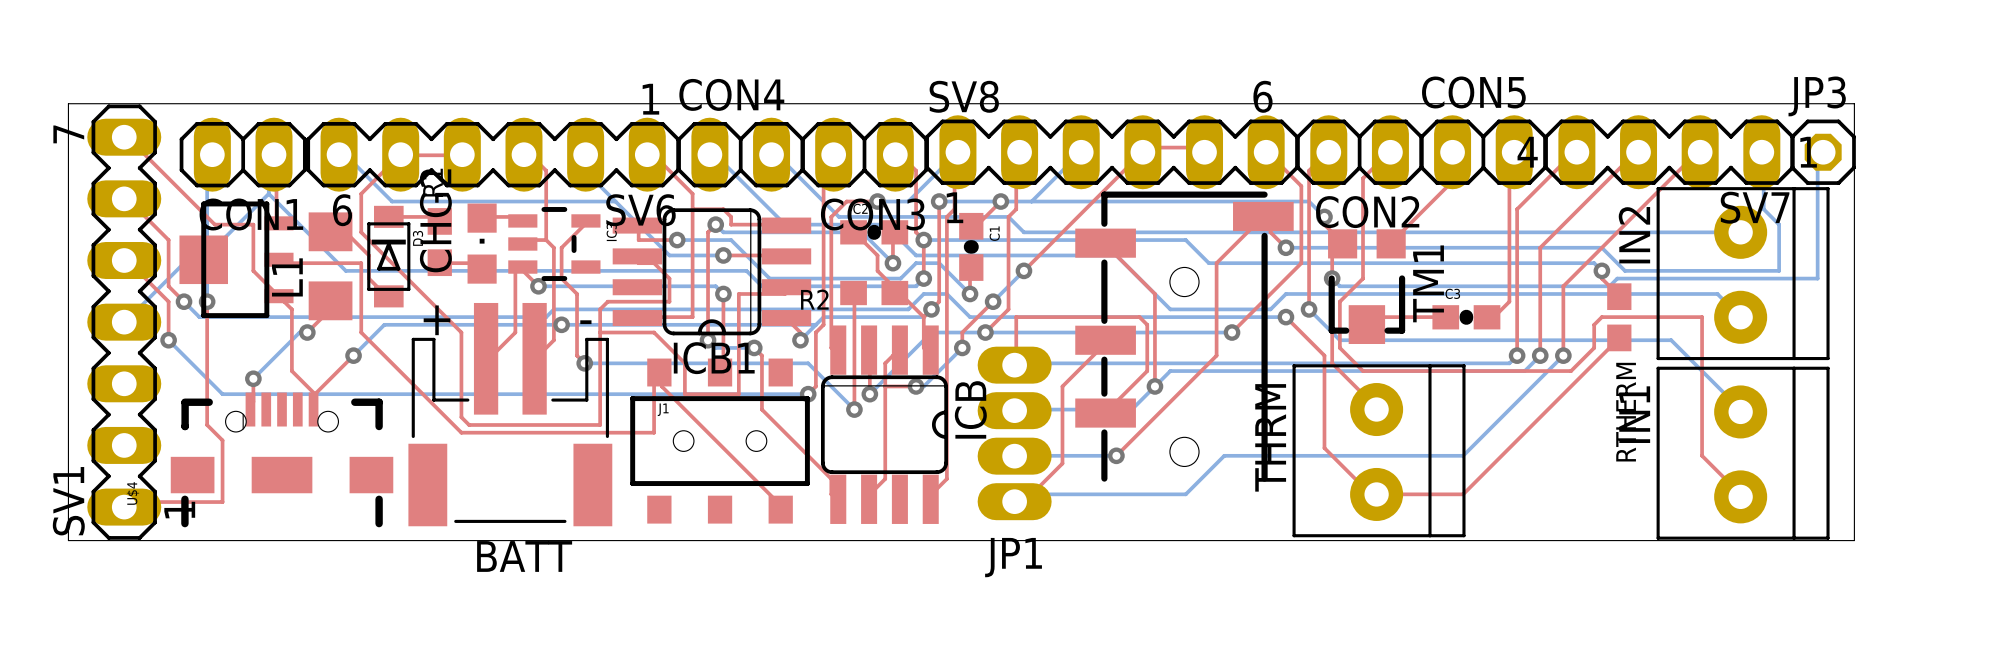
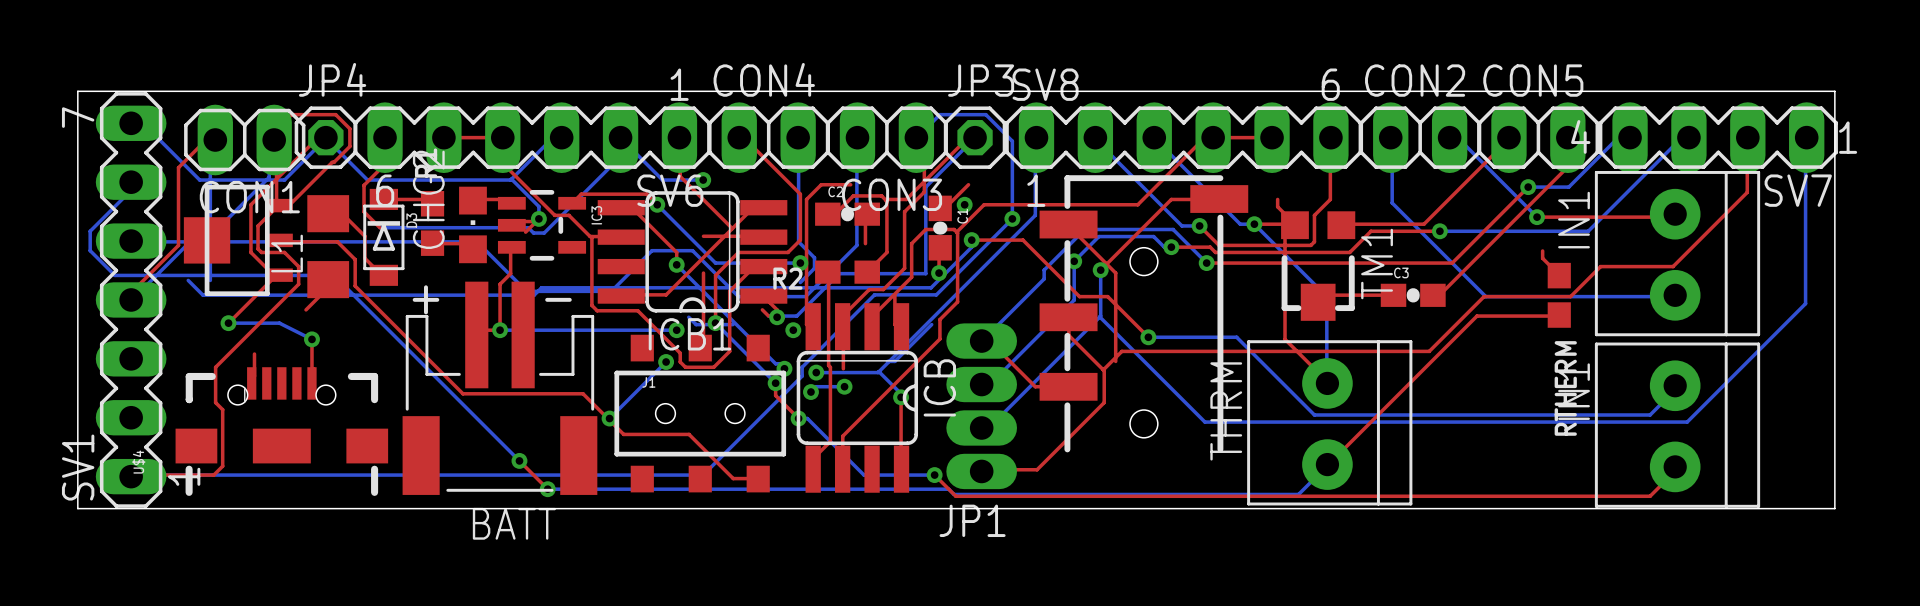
board edge: (1854, 103) (1854, 540) -> (1783, 91) (1834, 91) (1834, 508) (1783, 508)
top track: (124, 137) (130, 139) (214, 224) (253, 224) (253, 270) (291, 309) (291, 371) (315, 394) (353, 355) -> none
bottom track: none -> (131, 123) (143, 123) (199, 180) (284, 180) (325, 137) (367, 180) (510, 180) (551, 139) (561, 137)
top track: none -> (208, 137) (178, 167) (178, 245) (132, 291) (131, 299)
top track: none -> (325, 137) (325, 139) (316, 139) (250, 204) (250, 252) (272, 273) (278, 275) (276, 275) (228, 323)
JP4: none -> (325, 137)
top track: none -> (385, 137) (383, 165) (364, 185) (364, 211) (379, 227)
top track: none -> (679, 137) (680, 176) (732, 228)
top track: none -> (739, 137) (745, 139) (800, 194) (800, 240) (788, 252) (738, 252) (715, 275) (715, 323)
bottom track: none -> (798, 137) (798, 241) (814, 257) (814, 268) (800, 282)
bottom track: none -> (857, 137) (856, 245) (805, 296) (738, 296) (692, 250) (651, 250) (611, 291) (526, 291) (477, 241) (131, 241)
bottom track: none -> (916, 137) (939, 114) (985, 114) (1012, 141) (1012, 218) (936, 294) (874, 294) (802, 367) (802, 376) (703, 475) (132, 475) (131, 476)
bottom track: (957, 152) (908, 201) (877, 201) -> none
top track: none -> (975, 137) (966, 139) (906, 199) (886, 200)
bottom track: none -> (975, 137) (925, 187) (925, 273) (839, 273) (796, 316) (768, 316)
top track: (1019, 152) (1016, 155) (1016, 209) (1008, 216) (1008, 309) (985, 332) -> none
bottom track: none -> (1036, 137) (1035, 215) (878, 372) (816, 372)
bottom track: (1081, 152) (1031, 201) -> none
SV8 position: (1112, 152) -> (1183, 137)
bottom track: none -> (1095, 137) (1181, 225) (1199, 225)
bottom track: none -> (1154, 137) (1240, 224) (1254, 224) (1326, 296) (1327, 383)
top track: (1204, 152) (1201, 147) (1147, 147) (1023, 270) -> none
top track: (1266, 152) (1301, 186) (1301, 263) (1232, 332) -> none
top track: none -> (1272, 137) (1213, 137) (1203, 139) (1137, 204) (984, 204) (956, 232)
top track: (1328, 152) (1309, 170) (1309, 309) -> none
CON2 position: (1359, 152) -> (1420, 137)
top track: (1390, 152) (1363, 178) (1363, 233) -> (1330, 137) (1330, 199) (1314, 215)
bottom track: none -> (1390, 137) (1392, 203) (1485, 296) (1679, 297)
top track: (1452, 152) (1447, 155) (1447, 186) (1391, 243) -> (1508, 137) (1423, 224) (1341, 225)
CON5 position: (1483, 152) -> (1538, 137)
bottom track: none -> (1449, 137) (1450, 139) (1459, 139) (1537, 217)
top track: (1514, 152) (1509, 155) (1509, 301) -> (1567, 137) (1567, 167) (1454, 280)
top track: (1576, 152) (1571, 155) (1517, 209) (1517, 355) -> none
top track: (1638, 152) (1632, 155) (1540, 247) (1540, 355) -> none
SV7 position: (1669, 152) -> (1718, 137)
bottom track: none -> (1630, 137) (1618, 137) (1568, 187) (1528, 187)
top track: (1700, 152) (1694, 155) (1563, 286) (1563, 355) -> none
bottom track: none -> (1688, 137) (1681, 137) (1588, 231) (1439, 231)
bottom track: (1761, 152) (1763, 155) (1763, 209) (1779, 224) (1779, 270) (1625, 270) (1601, 247) (1285, 247) -> none
top track: none -> (1747, 137) (1747, 192) (1673, 266) (1600, 266) (1570, 296) (1484, 296) (1429, 351) (1121, 351) (1103, 369)
bottom track: (1823, 152) (1817, 155) (1817, 278) (1617, 278) (1609, 286) (1339, 286) (1332, 278) -> none
JP3 position: (1823, 152) -> (975, 137)
bottom track: none -> (1806, 137) (1805, 303) (1687, 422) (1204, 422) (1099, 316)
bottom track: (339, 154) (345, 155) (392, 201) (615, 201) -> none
top track: (462, 154) (399, 155) (361, 193) (361, 232) (461, 332) (461, 417) (469, 424) (600, 424) (600, 309) (607, 301) (669, 301) (669, 278) (654, 263) (638, 263) (637, 256) -> (443, 137) (502, 137) (503, 164) (554, 215) (568, 215) (590, 236) (621, 237)
SV6 position: (493, 154) -> (532, 137)
top track: (523, 154) (530, 155) (546, 170) (546, 240) (553, 247) (553, 340) (534, 358) -> none
bottom track: (585, 154) (592, 155) (592, 178) (669, 255) (723, 255) -> none
top track: (647, 154) (654, 155) (692, 193) (692, 317) (637, 318) -> none
bottom track: (709, 154) (715, 155) (785, 224) (885, 224) (916, 255) (1116, 255) (1170, 309) (1270, 309) (1285, 293) (1717, 293) (1740, 317) -> none
CON4 position: (740, 154) -> (768, 137)
bottom track: (771, 154) (777, 155) (839, 216) (1008, 216) (1023, 232) (1740, 232) -> none
top track: (833, 154) (823, 162) (823, 324) (815, 332) (815, 386) (808, 394) -> none
CON3 position: (864, 154) -> (886, 137)
top track: (895, 154) (900, 155) (916, 170) (916, 232) (923, 240) (923, 278) -> none
bottom track: (268, 193) (345, 270) (746, 270) (761, 286) (916, 286) (923, 278) -> none
bottom track: none -> (511, 179) (538, 206) (538, 218)
bottom track: none -> (703, 180) (662, 180) (620, 137) (629, 148) (544, 233) (533, 233) (528, 227) (379, 227)
via: none -> (703, 180)
top track: (124, 198) (130, 201) (168, 240) (168, 286) (184, 301) -> none
bottom track: none -> (131, 182) (130, 190) (90, 231) (90, 250) (114, 275) (333, 275) (519, 460)
via: (877, 201) -> none
top track: (939, 201) (939, 301) (923, 317) (900, 293) (894, 293) (892, 286) (877, 270) (877, 255) (853, 232) -> (867, 271) (886, 252) (886, 201) (881, 195) (853, 195) (835, 213) (827, 214)
bottom track: (939, 201) (1309, 201) (1324, 216) -> none
via: (939, 201) -> none
via position: (1000, 201) -> (964, 204)
top track: none -> (1528, 187) (1452, 263) (1206, 263)
via: none -> (1528, 187)
top track: (692, 209) (723, 209) (731, 216) (731, 224) (786, 225) -> (621, 296) (666, 294) (752, 208) (763, 207)
CON2 name position: CON2 (1367, 212) -> CON2 (1415, 80)
top track: (946, 216) (946, 478) (931, 494) (930, 499) -> (916, 199) (904, 211) (904, 268) (883, 289) (869, 289) (842, 316) (842, 326)
top track: none -> (1219, 199) (1171, 199) (1100, 270)
via: (1324, 216) -> none
top track: (585, 220) (584, 224) (561, 247) (561, 278) (577, 293) (577, 355) (584, 363) -> (572, 203) (581, 194) (646, 194) (657, 204)
bottom track: none -> (657, 204) (715, 263) (800, 263)
top track: (715, 224) (708, 232) (708, 340) -> none
bottom track: (715, 224) (723, 232) (862, 232) (892, 263) -> none
via: (715, 224) -> none
top track: (637, 225) (638, 240) (677, 240) -> (621, 207) (632, 208) (676, 252) (676, 264)
top track: none -> (1679, 216) (1537, 217)
via: none -> (1537, 217)
IN2 name: IN2 (1634, 235) -> IN1 (1574, 220)
top track: none -> (538, 218) (525, 232)
via: none -> (538, 218)
via: none -> (1012, 218)
bottom track: (677, 240) (731, 240) (769, 278) (900, 278) (916, 263) (939, 263) (970, 293) -> none
via position: (677, 240) -> (657, 204)
bottom track: (923, 240) (1185, 240) (1208, 263) (1594, 263) (1601, 270) -> none
via: (923, 240) -> none
top track: none -> (1254, 224) (1294, 225)
via: none -> (1199, 225)
top track: (1285, 247) (1270, 232) (1270, 216) (1263, 216) (1216, 263) (1216, 355) (1116, 455) -> none
via position: (1285, 247) -> (1254, 224)
top track: none -> (1439, 231) (1370, 231) (1349, 252) (1215, 252) (1210, 247) (1171, 247)
via: none -> (1439, 231)
via: (723, 255) -> none
top track: (278, 259) (284, 263) (361, 263) (361, 332) (461, 432) (654, 432) (654, 378) (659, 372) (661, 386) (777, 502) (780, 509) -> (278, 240) (337, 241) (355, 259) (355, 286) (462, 393) (583, 393) (623, 434) (689, 434) (733, 478) (758, 479)
top track: none -> (971, 240) (1022, 240) (1079, 296) (1107, 296) (1148, 337)
via: none -> (971, 240)
top track: (124, 260) (130, 263) (168, 301) (168, 340) -> none
top track: (1363, 261) (1363, 278) (1339, 301) (1339, 347) (1363, 371) (1571, 371) (1594, 347) (1594, 324) (1601, 317) (1702, 317) (1702, 455) (1740, 494) (1740, 496) -> (1314, 241) (1310, 245) (1219, 245) (1199, 225)
via: (892, 263) -> none
via: none -> (1171, 247)
bottom track: (1023, 270) (993, 301) -> none
via: (1023, 270) -> none
via: (1601, 270) -> none
via: (923, 278) -> none
via: (1332, 278) -> none
via: none -> (1074, 261)
via: none -> (800, 263)
via: none -> (1206, 263)
bottom track: none -> (676, 264) (775, 363) (782, 363)
via: none -> (676, 264)
top track: (538, 286) (523, 270) (522, 267) (515, 270) (515, 332) (492, 355) (486, 358) -> (511, 247) (510, 273) (500, 284) (500, 330) (480, 330) (476, 334)
bottom track: (538, 286) (715, 286) (723, 293) -> none
via: (538, 286) -> none
top track: (786, 287) (785, 293) (738, 293) (738, 394) (684, 394) (684, 363) -> (763, 266) (763, 268) (752, 268) (729, 291) (729, 351) (713, 367) (685, 367) (680, 361) (680, 353) (666, 339)
via: none -> (1100, 270)
via: (723, 293) -> none
via: (184, 301) -> none
top track: (207, 301) (207, 424) (222, 440) (222, 502) (130, 502) (124, 507) -> (267, 137) (291, 114) (335, 114) (349, 128) (349, 146) (289, 204) (279, 204) (258, 225) (258, 248) (261, 252) (284, 252) (298, 266) (298, 284) (215, 367) (215, 402) (222, 409) (222, 466) (213, 475) (132, 475) (131, 476)
via: (207, 301) -> none
top track: (993, 301) (962, 332) (962, 347) -> none
via: (993, 301) -> none
bottom track: (908, 309) (923, 293) (946, 293) (970, 317) (1285, 317) -> (880, 287) (931, 287) (971, 247) (971, 240)
bottom track: (931, 309) (923, 317) (823, 317) (800, 340) -> none
via: (931, 309) -> none
bottom track: (1309, 309) (1339, 340) (1671, 340) (1740, 409) (1740, 411) -> none
via: (1309, 309) -> none
top track: (1285, 317) (1324, 355) (1324, 448) (1370, 494) (1463, 494) (1619, 337) -> (1327, 464) (1476, 316) (1559, 315)
via: (1285, 317) -> none
via: (561, 324) -> none
bottom track: (815, 324) (384, 324) (353, 355) -> none
bottom track: (307, 332) (299, 332) (253, 378) -> none
via: (307, 332) -> none
top track: (600, 332) (654, 333) -> (591, 236) (591, 305) (597, 310) (637, 310)
top track: none -> (762, 309) (768, 316)
via: (985, 332) -> none
bottom track: (1232, 332) (931, 332) (869, 394) -> none
via: (1232, 332) -> none
bottom track: (168, 340) (222, 394) (808, 394) -> none
via: (168, 340) -> none
via position: (708, 340) -> (676, 330)
top track: (1105, 340) (1101, 347) (1062, 386) (1062, 463) (1031, 494) (1016, 494) (1014, 501) -> (1068, 317) (1068, 335) (1104, 370) (1104, 402) (1037, 469) (982, 469) (981, 471)
bottom track: none -> (228, 323) (279, 323) (311, 339)
via: none -> (228, 323)
bottom track: none -> (715, 323) (775, 383)
via: none -> (715, 323)
top track: (754, 347) (761, 355) (761, 409) (831, 478) (831, 494) (838, 499) -> none
via: (754, 347) -> none
via: (962, 347) -> none
top track: (899, 350) (885, 363) (885, 478) (869, 494) (869, 499) -> (872, 326) (872, 316) (911, 277) (911, 243) (925, 229) (954, 229) (957, 233) (957, 301) (939, 319) (939, 339) (842, 436) (842, 469)
bottom track: none -> (500, 330) (676, 330)
via: none -> (500, 330)
via: none -> (793, 330)
via: (353, 355) -> none
bottom track: (1517, 355) (1509, 363) (1016, 363) (1014, 365) -> (1206, 263) (1173, 229) (1084, 229) (1044, 270) (1044, 278) (981, 341)
via: (1517, 355) -> none
bottom track: (1540, 355) (1524, 371) (1170, 371) (1131, 409) (1014, 410) -> (1171, 247) (1164, 247) (1153, 236) (1098, 236) (1074, 261) (1074, 300) (991, 383) (981, 384)
via: (1540, 355) -> none
bottom track: (1563, 355) (1463, 455) (1224, 455) (1185, 494) (1016, 494) (1014, 501) -> none
via: (1563, 355) -> none
bottom track: none -> (1148, 337) (1236, 337) (1314, 414) (1650, 414) (1679, 385)
via: none -> (1148, 337)
top track: none -> (311, 339) (311, 383)
via: none -> (311, 339)
bottom track: (584, 363) (808, 363) (854, 409) -> none
via: (584, 363) -> none
top track: (1014, 365) (1016, 363) (1016, 317) (1139, 317) (1147, 324) (1147, 371) (1105, 413) -> (981, 341) (991, 342) (1035, 386) (1068, 386)
via: (253, 378) -> none
top track: (885, 386) (916, 386) -> none
via: (916, 386) -> none
via: (1154, 386) -> none
bottom track: none -> (666, 361) (609, 418)
via: none -> (666, 361)
top track: (854, 390) (854, 409) -> (828, 365) (830, 367) (830, 441) (814, 457) (813, 469)
via: (869, 394) -> none
bottom track: none -> (878, 371) (901, 393) (901, 397)
via: none -> (816, 372)
top track: none -> (775, 383) (775, 395) (798, 418)
via: none -> (775, 383)
via: (854, 409) -> none
bottom track: none -> (844, 386) (816, 386) (810, 392)
via: none -> (844, 386)
via: none -> (810, 392)
top track: none -> (901, 397) (901, 469)
via: none -> (901, 397)
via: none -> (609, 418)
bottom track: none -> (798, 418) (807, 418) (863, 475) (934, 475)
via: none -> (798, 418)
bottom track: (1116, 455) (1014, 456) -> (1100, 270) (1100, 316) (989, 427) (981, 427)
via: (1116, 455) -> none
top track: none -> (519, 460) (547, 489)
via: none -> (519, 460)
bottom track: none -> (1327, 464) (1298, 494) (954, 494) (948, 489) (547, 489)
top track: none -> (1679, 466) (1650, 496) (955, 496) (934, 475)
via: none -> (934, 475)
via: none -> (547, 489)

